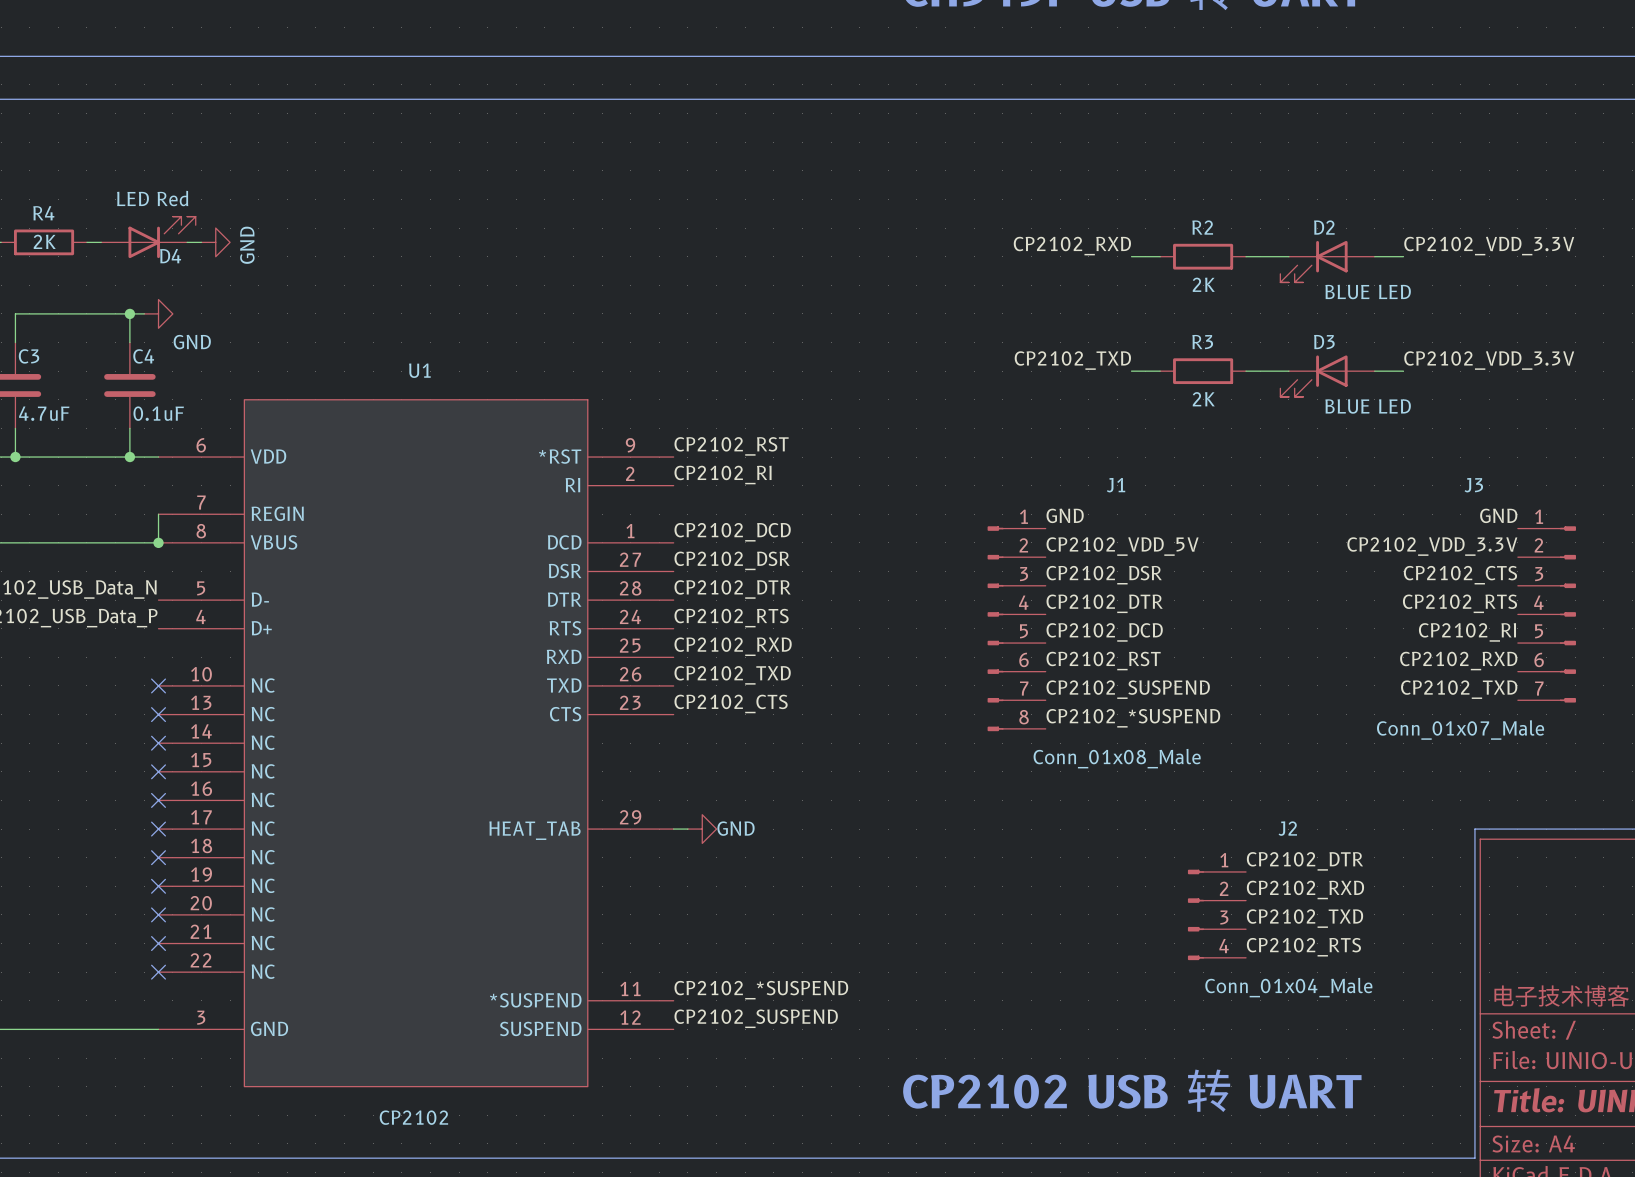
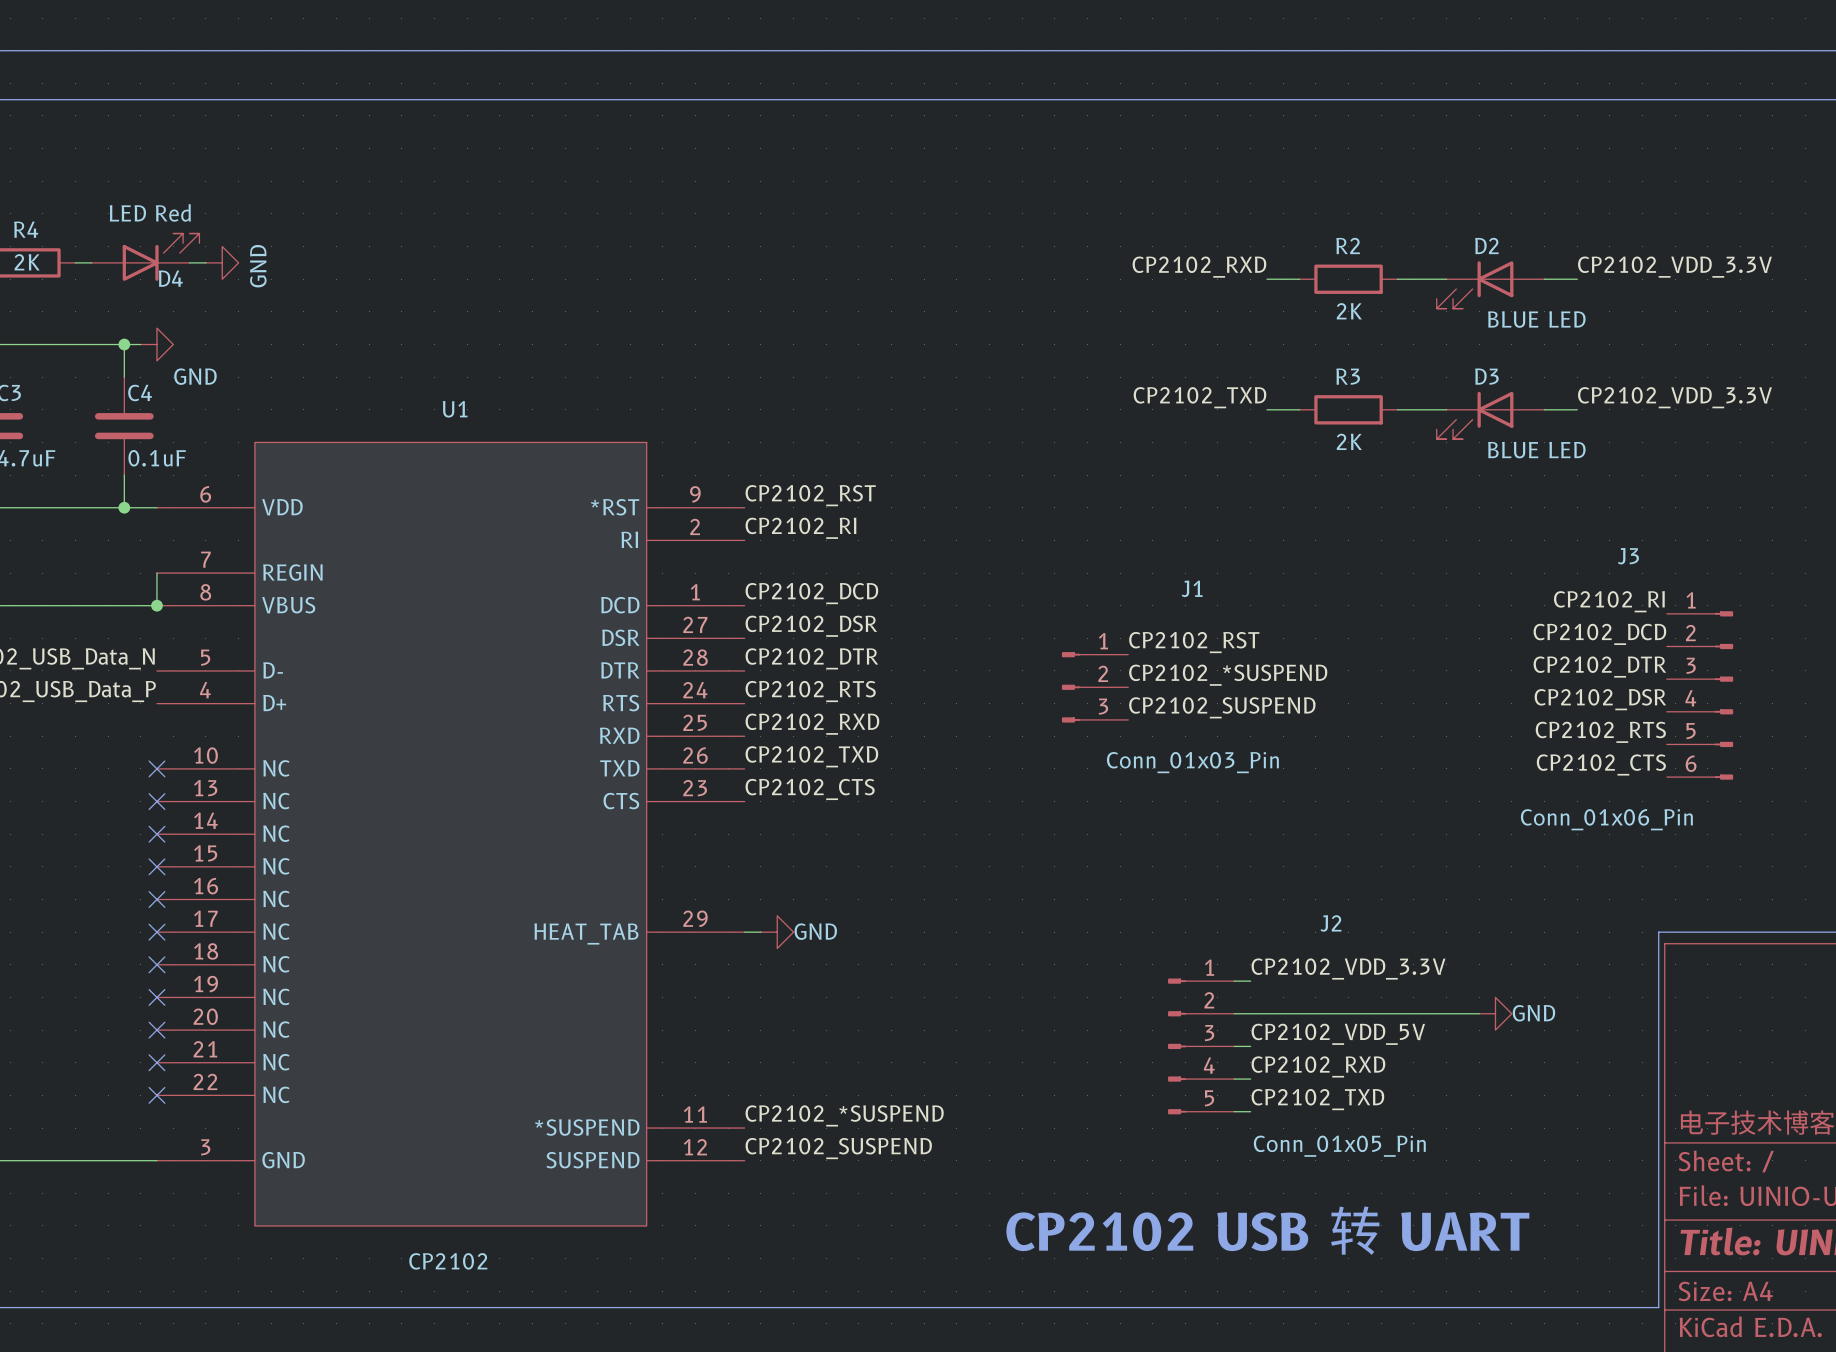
J1 name position: J1 (1116, 485) -> J1 (1192, 588)
label: GND (1065, 515) -> none
label: GND (1498, 515) -> none
J1 symbol: [987, 526, 1046, 732] -> [1061, 652, 1129, 723]
J3 symbol: [1517, 526, 1576, 703] -> [1666, 611, 1734, 780]
label: CP2102_VDD_5V (1122, 546) -> none
label: CP2102_VDD_3.3V (1432, 546) -> CP2102_DCD (1599, 634)
label: CP2102_DSR (1104, 575) -> none
label position: CP2102_CTS (1460, 575) -> CP2102_CTS (1601, 764)
label: none -> CP2102_DTR (1599, 667)
label: CP2102_DTR (1104, 603) -> none
label position: CP2102_RTS (1459, 603) -> CP2102_RTS (1600, 732)
label: none -> CP2102_DSR (1600, 699)
label: CP2102_DCD (1104, 632) -> none
label position: CP2102_RI (1467, 632) -> CP2102_RI (1609, 601)
label position: CP2102_RST (1103, 661) -> CP2102_RST (1194, 642)
label: CP2102_RXD (1458, 661) -> none
label position: CP2102_SUSPEND (1128, 689) -> CP2102_SUSPEND (1222, 707)
label: CP2102_TXD (1459, 689) -> none
label position: CP2102_*SUSPEND (1133, 718) -> CP2102_*SUSPEND (1228, 675)
J3 value: Conn_01x07_Male (1460, 730) -> Conn_01x06_Pin (1606, 819)
J1 value: Conn_01x08_Male (1117, 758) -> Conn_01x03_Pin (1192, 762)
J2 name position: J2 (1287, 828) -> J2 (1330, 923)
label: CP2102_DTR (1304, 861) -> CP2102_VDD_3.3V (1348, 969)
J2 symbol: [1187, 869, 1247, 961] -> [1168, 978, 1235, 1115]
wire: none -> (1234, 981) (1250, 981)
label position: CP2102_RXD (1305, 889) -> CP2102_RXD (1318, 1066)
wire: none -> (1234, 1013) (1479, 1013)
power symbol: none -> GND (1495, 1013)
label position: CP2102_TXD (1304, 918) -> CP2102_TXD (1317, 1099)
wire: none -> (1234, 1046) (1250, 1046)
label: CP2102_RTS (1303, 947) -> CP2102_VDD_5V (1338, 1034)
wire: none -> (1234, 1079) (1250, 1079)
wire: none -> (1234, 1111) (1250, 1111)
J2 value: Conn_01x04_Male (1288, 987) -> Conn_01x05_Pin (1339, 1146)

